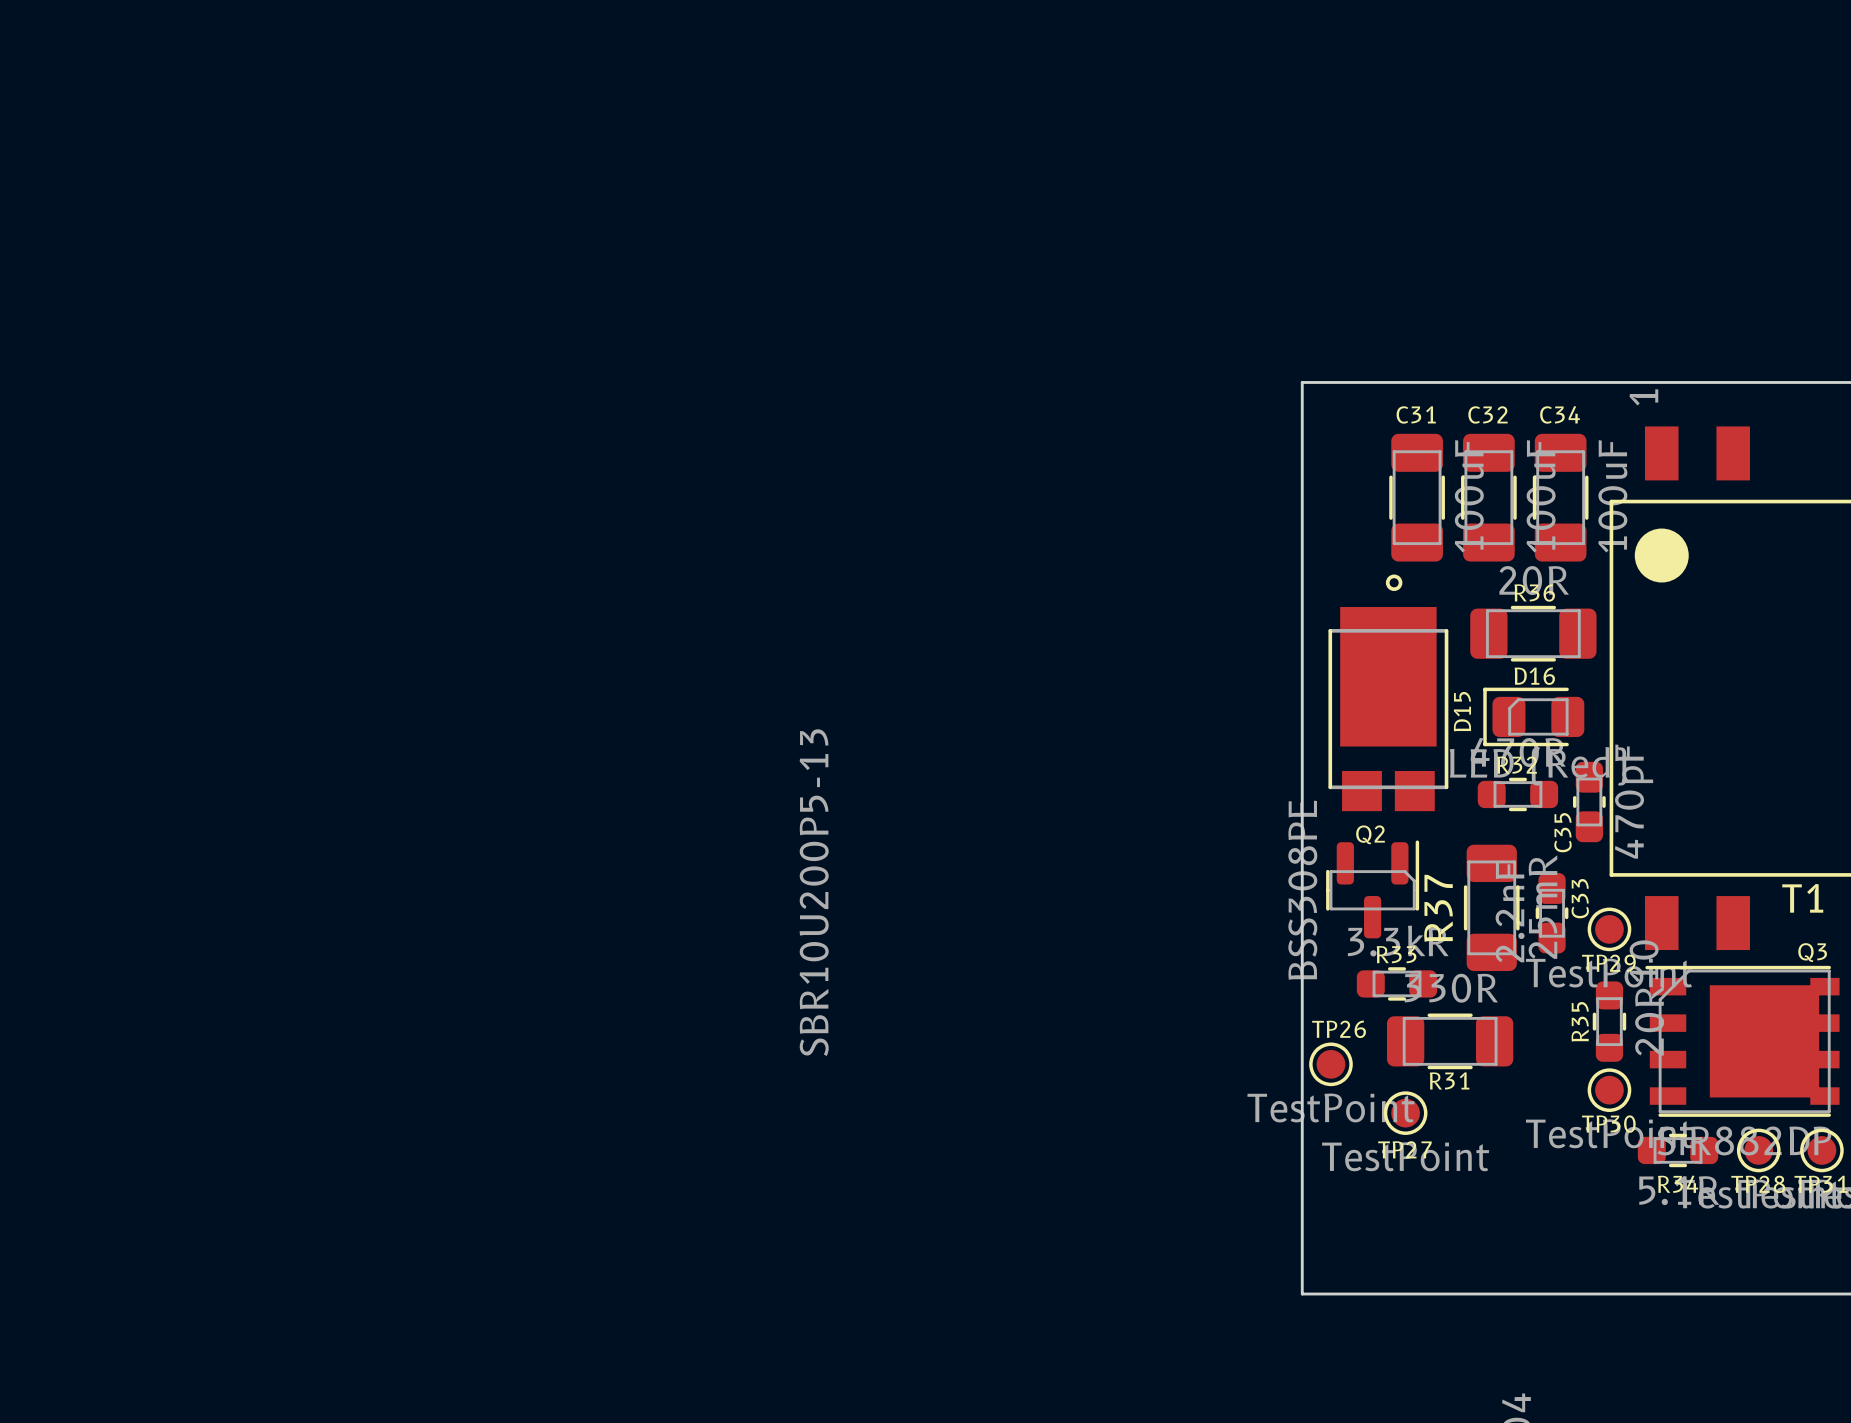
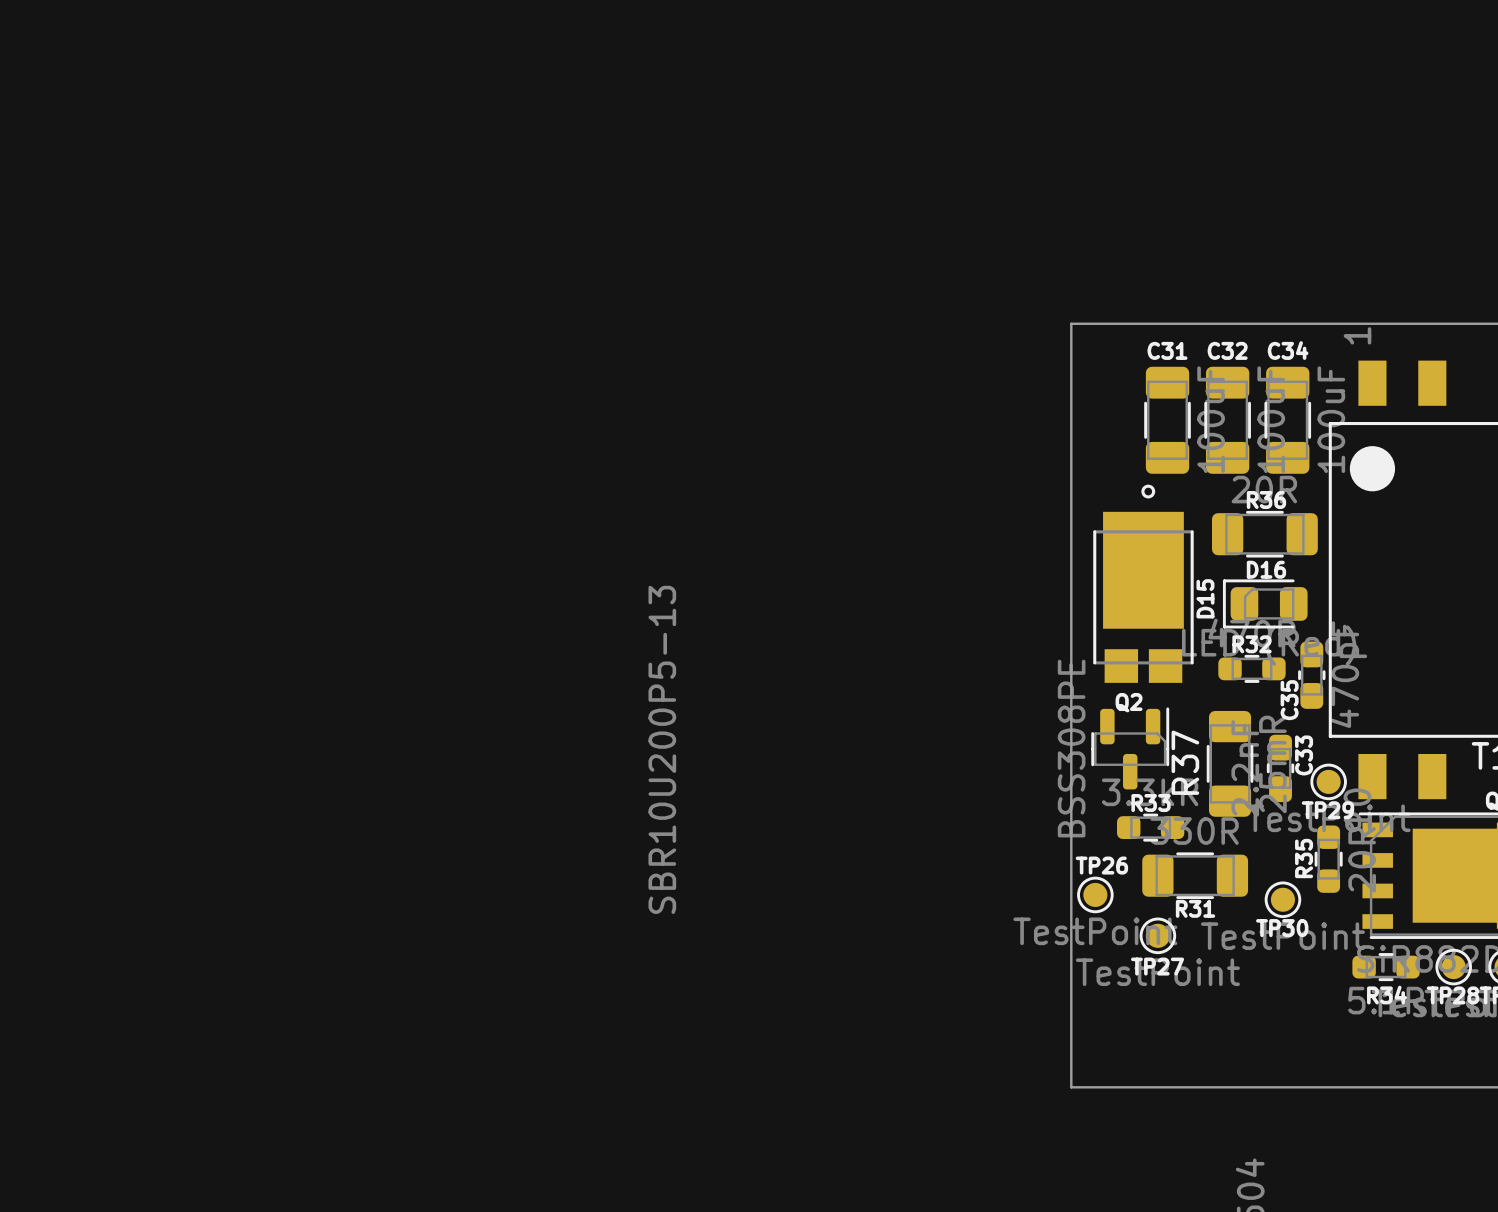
TP30 position: (1609, 1090) -> (1282, 899)

